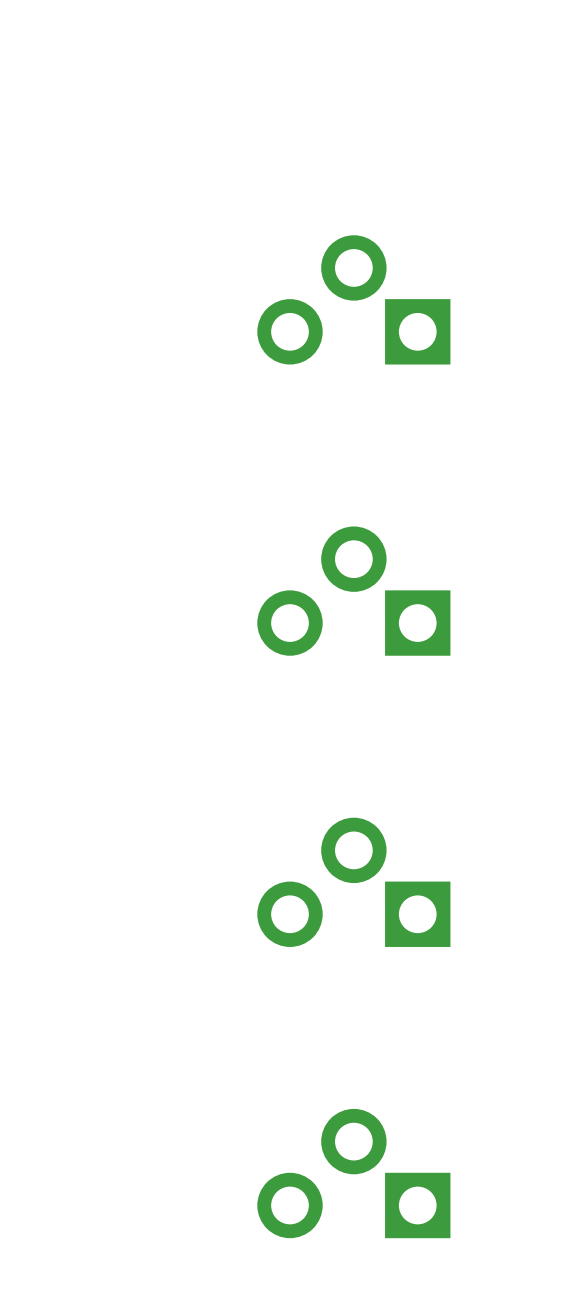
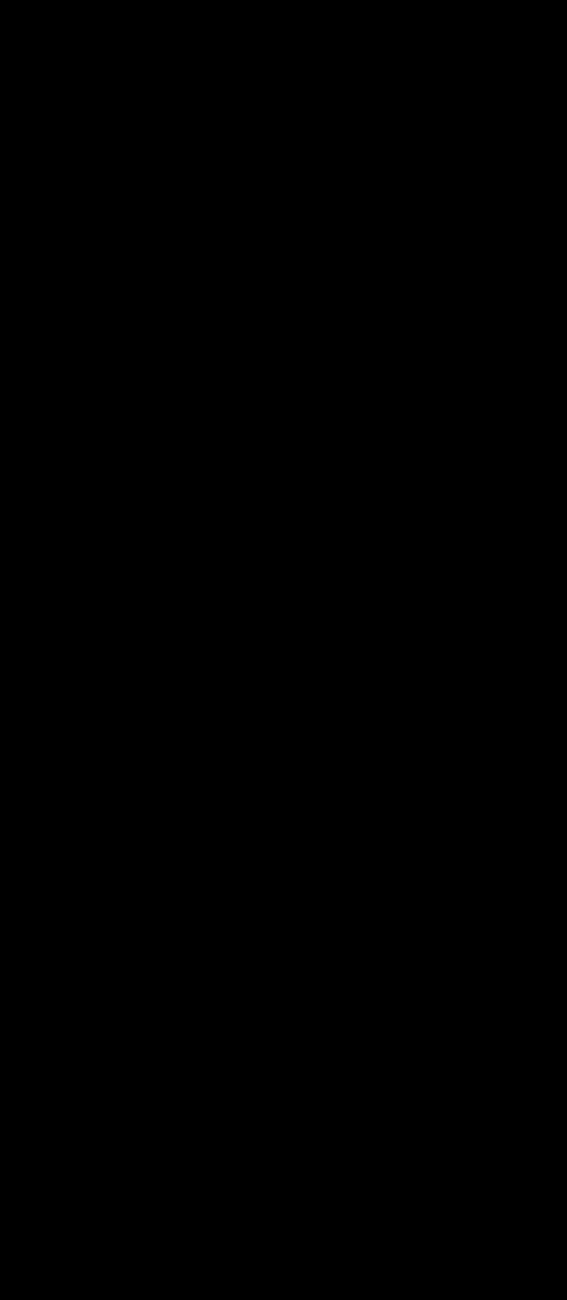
part: (353, 299) -> none
part: (353, 591) -> none
part: (353, 882) -> none
part: (353, 1173) -> none

